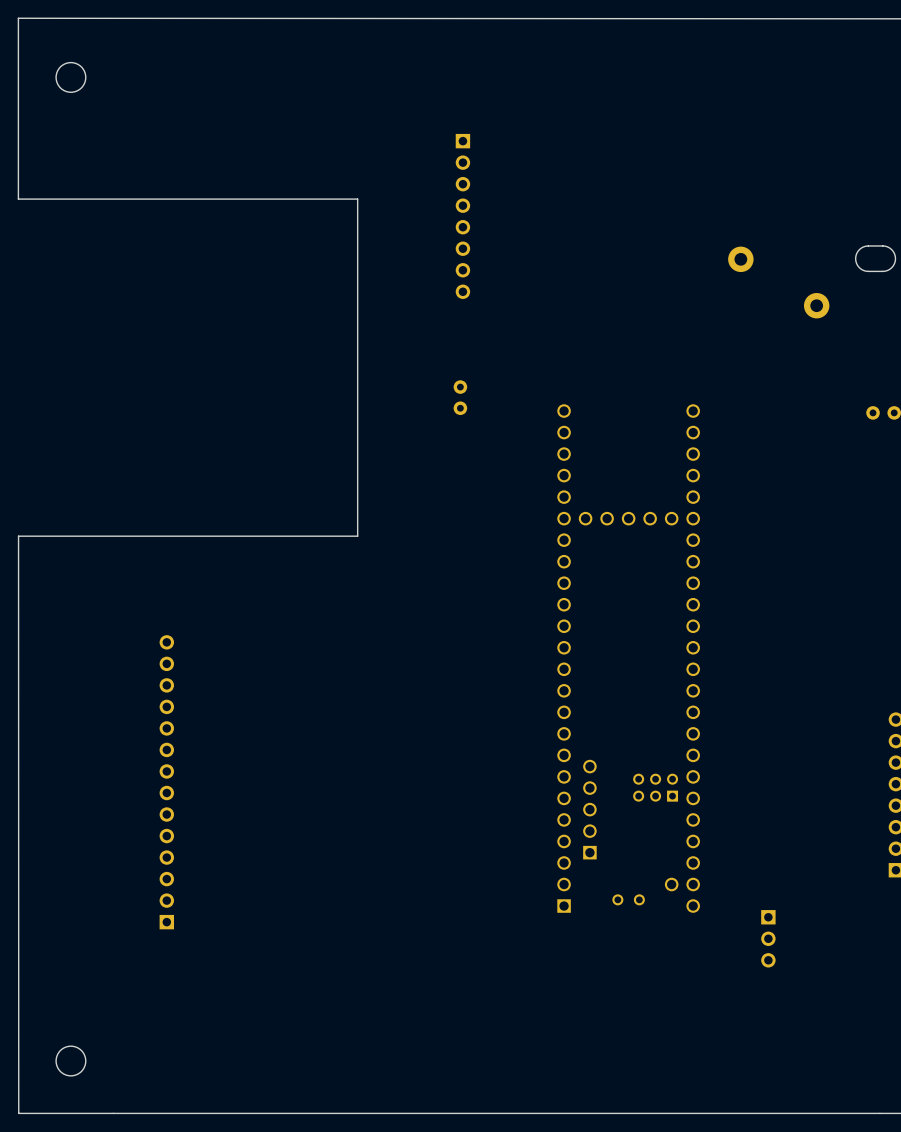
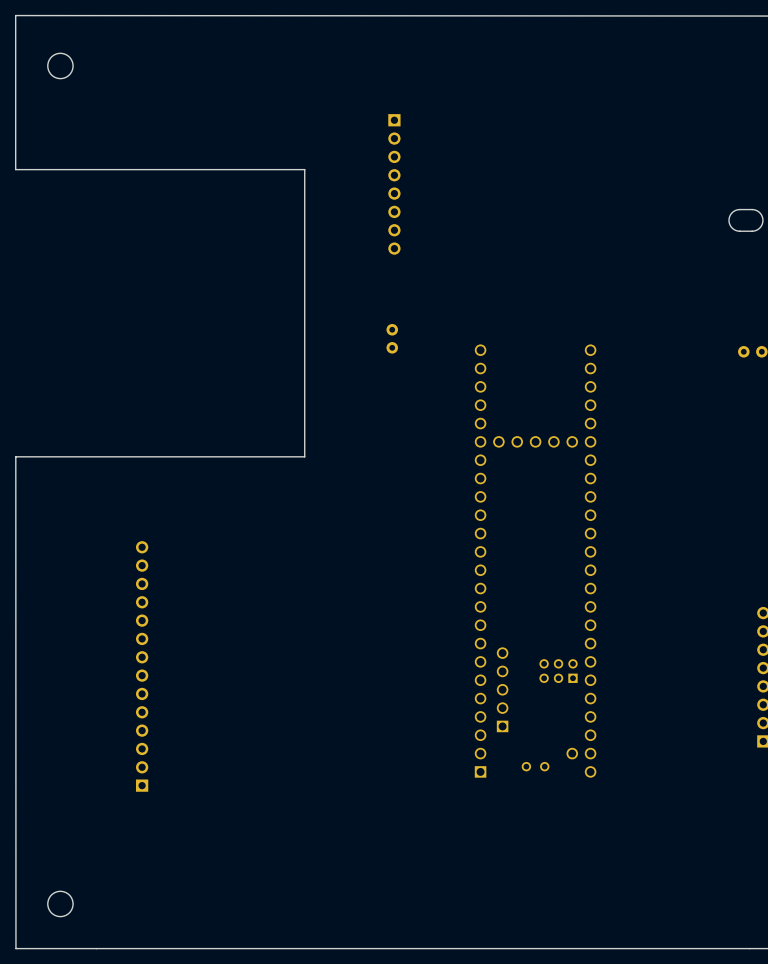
part: (740, 259) -> none
part: (816, 305) -> none
part: (768, 938) -> none

